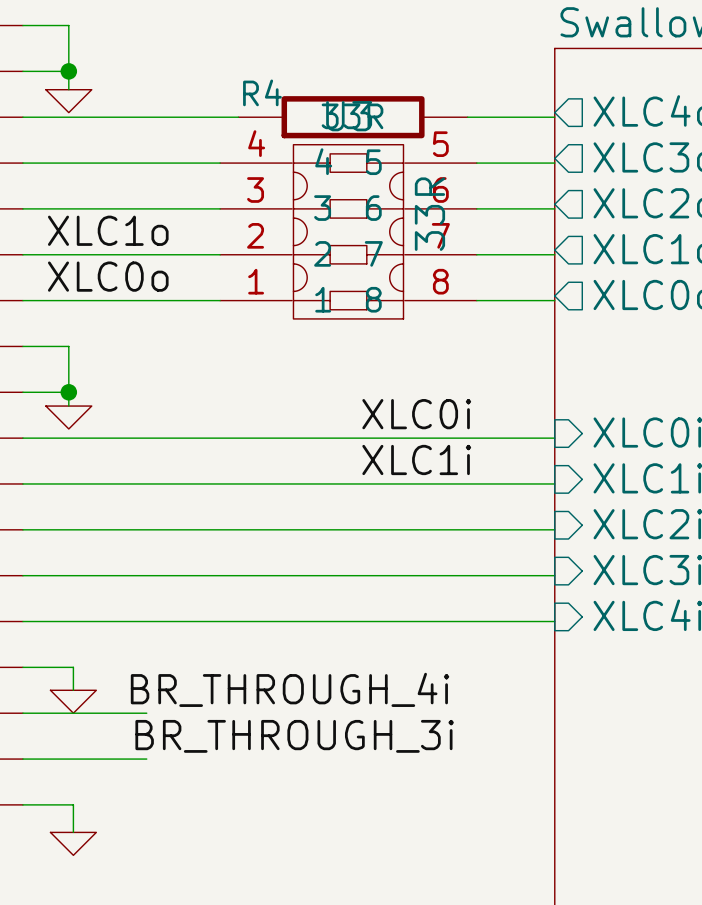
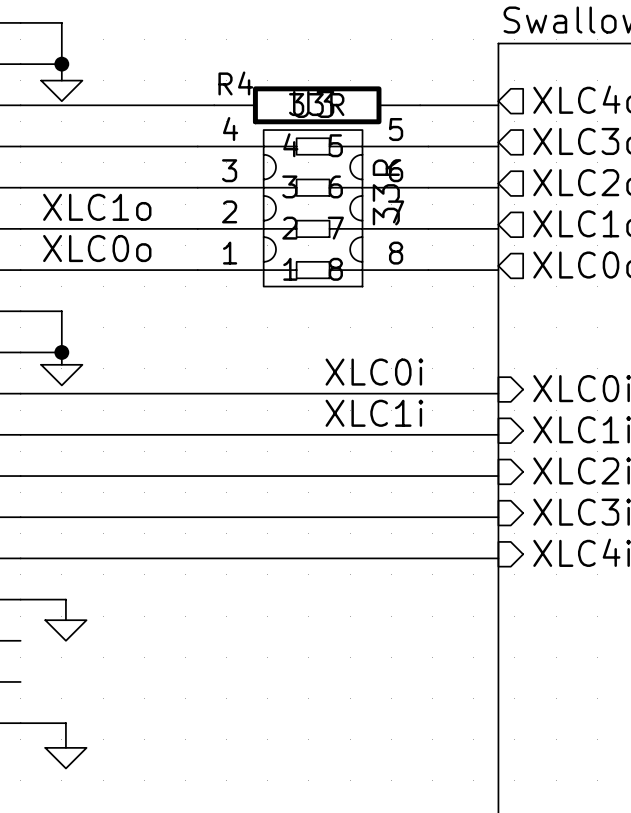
label: BR_THROUGH_4i (290, 689) -> none
wire: (22, 713) (146, 713) -> none
label: BR_THROUGH_3i (294, 736) -> none
wire: (22, 759) (146, 759) -> none

